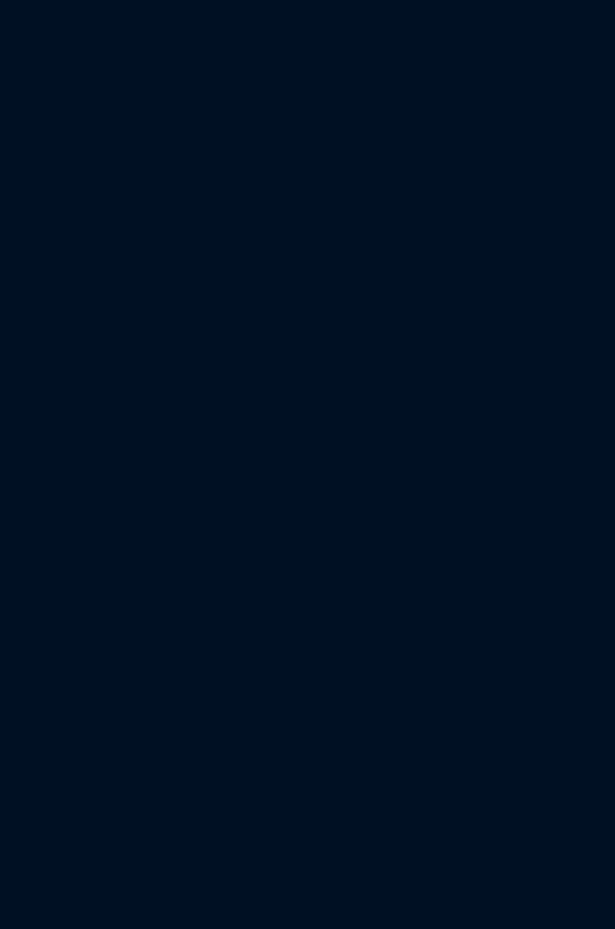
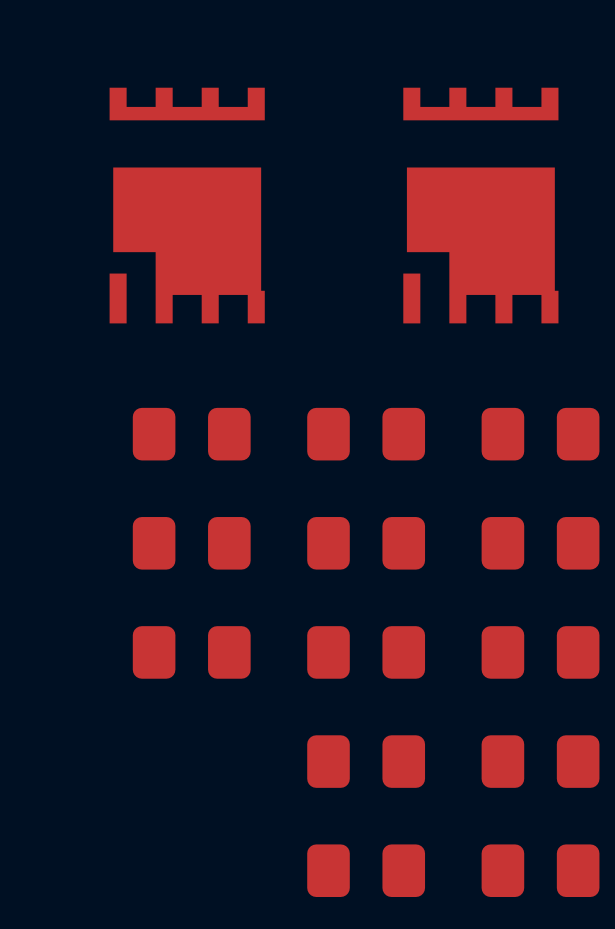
part: none -> (187, 205)
part: none -> (480, 205)
part: none -> (191, 434)
part: none -> (366, 434)
part: none -> (540, 434)
part: none -> (191, 543)
part: none -> (366, 543)
part: none -> (540, 543)
part: none -> (191, 652)
part: none -> (366, 652)
part: none -> (540, 652)
part: none -> (366, 761)
part: none -> (540, 761)
part: none -> (366, 870)
part: none -> (540, 870)

